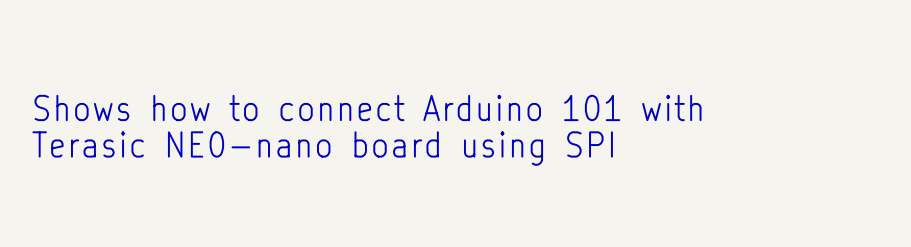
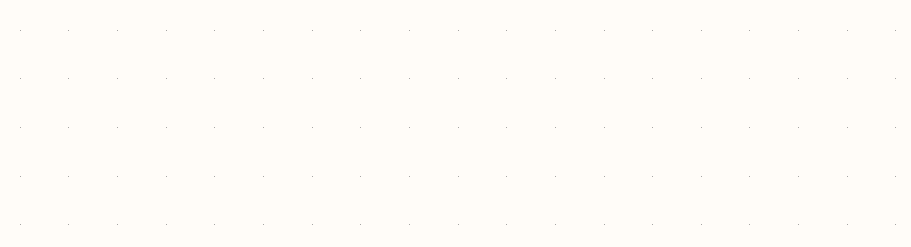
text: Shows how to connect Arduino 101 with (368, 107) -> none
text: Terasic NE0-nano board using SPI (322, 148) -> none

